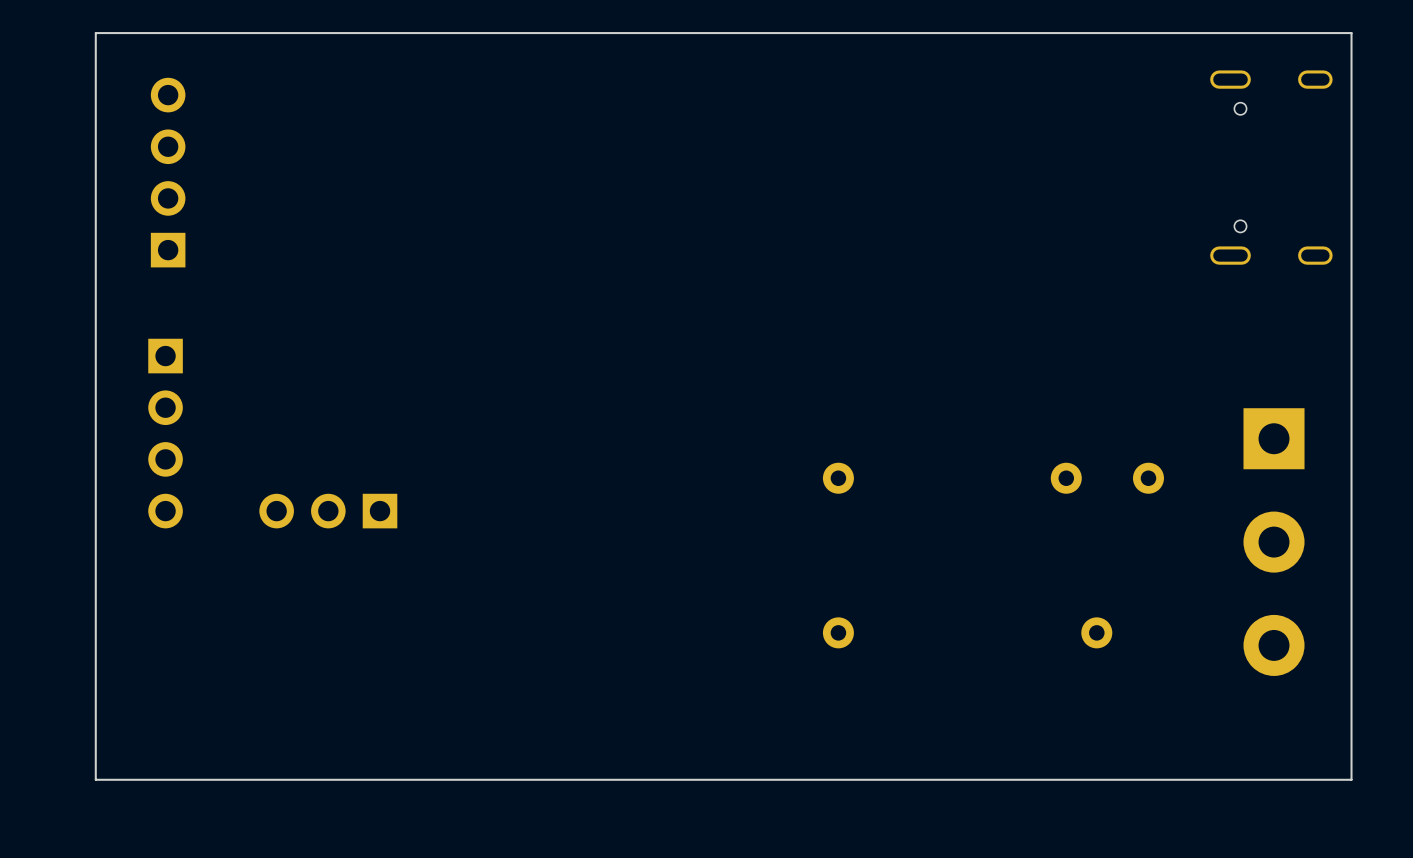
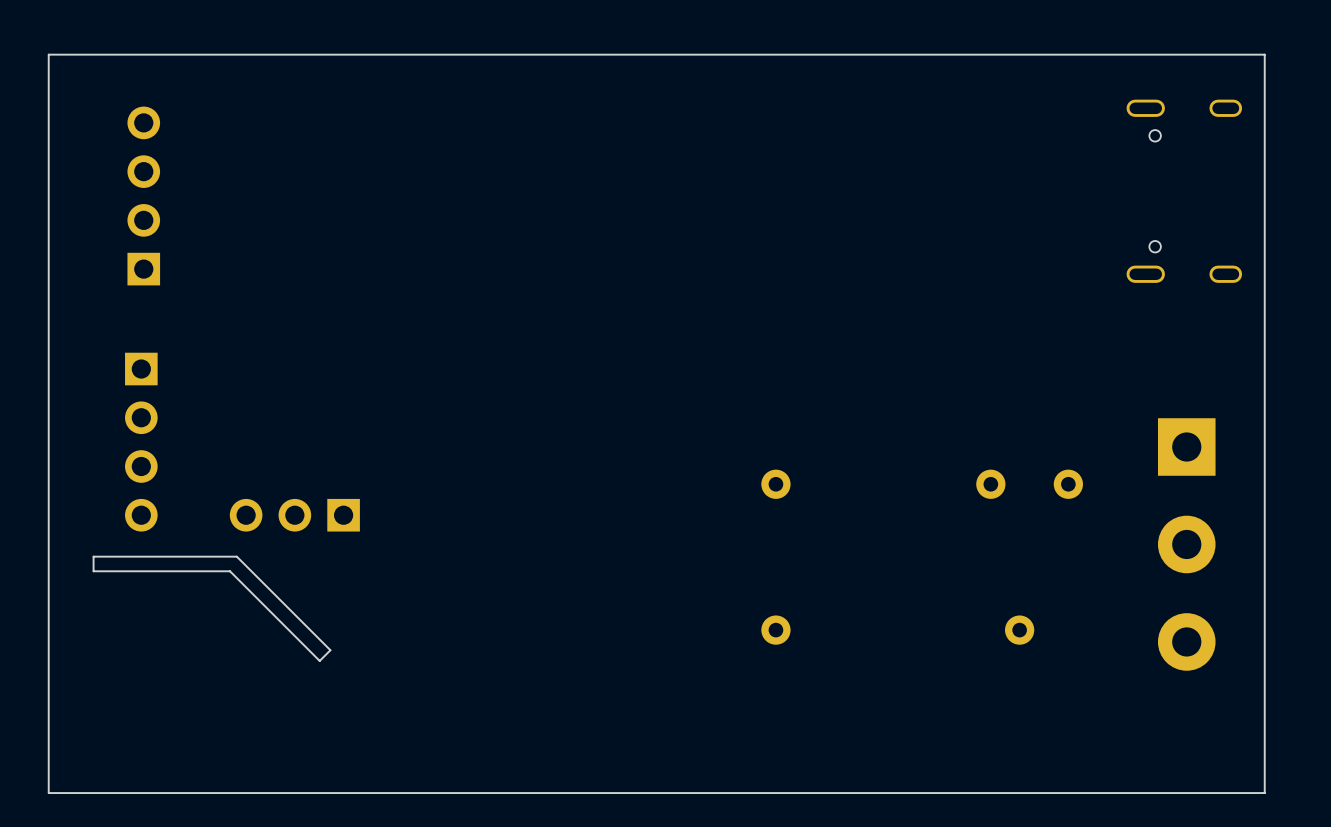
board edge: (1351, 33) (95, 33) (95, 779) (1351, 779) (1351, 33) -> (1264, 54) (1264, 793) (48, 793) (48, 54) (1264, 54)
board edge: none -> (236, 556) (330, 650) (319, 660) (230, 571) (93, 571) (93, 556) (236, 556)

